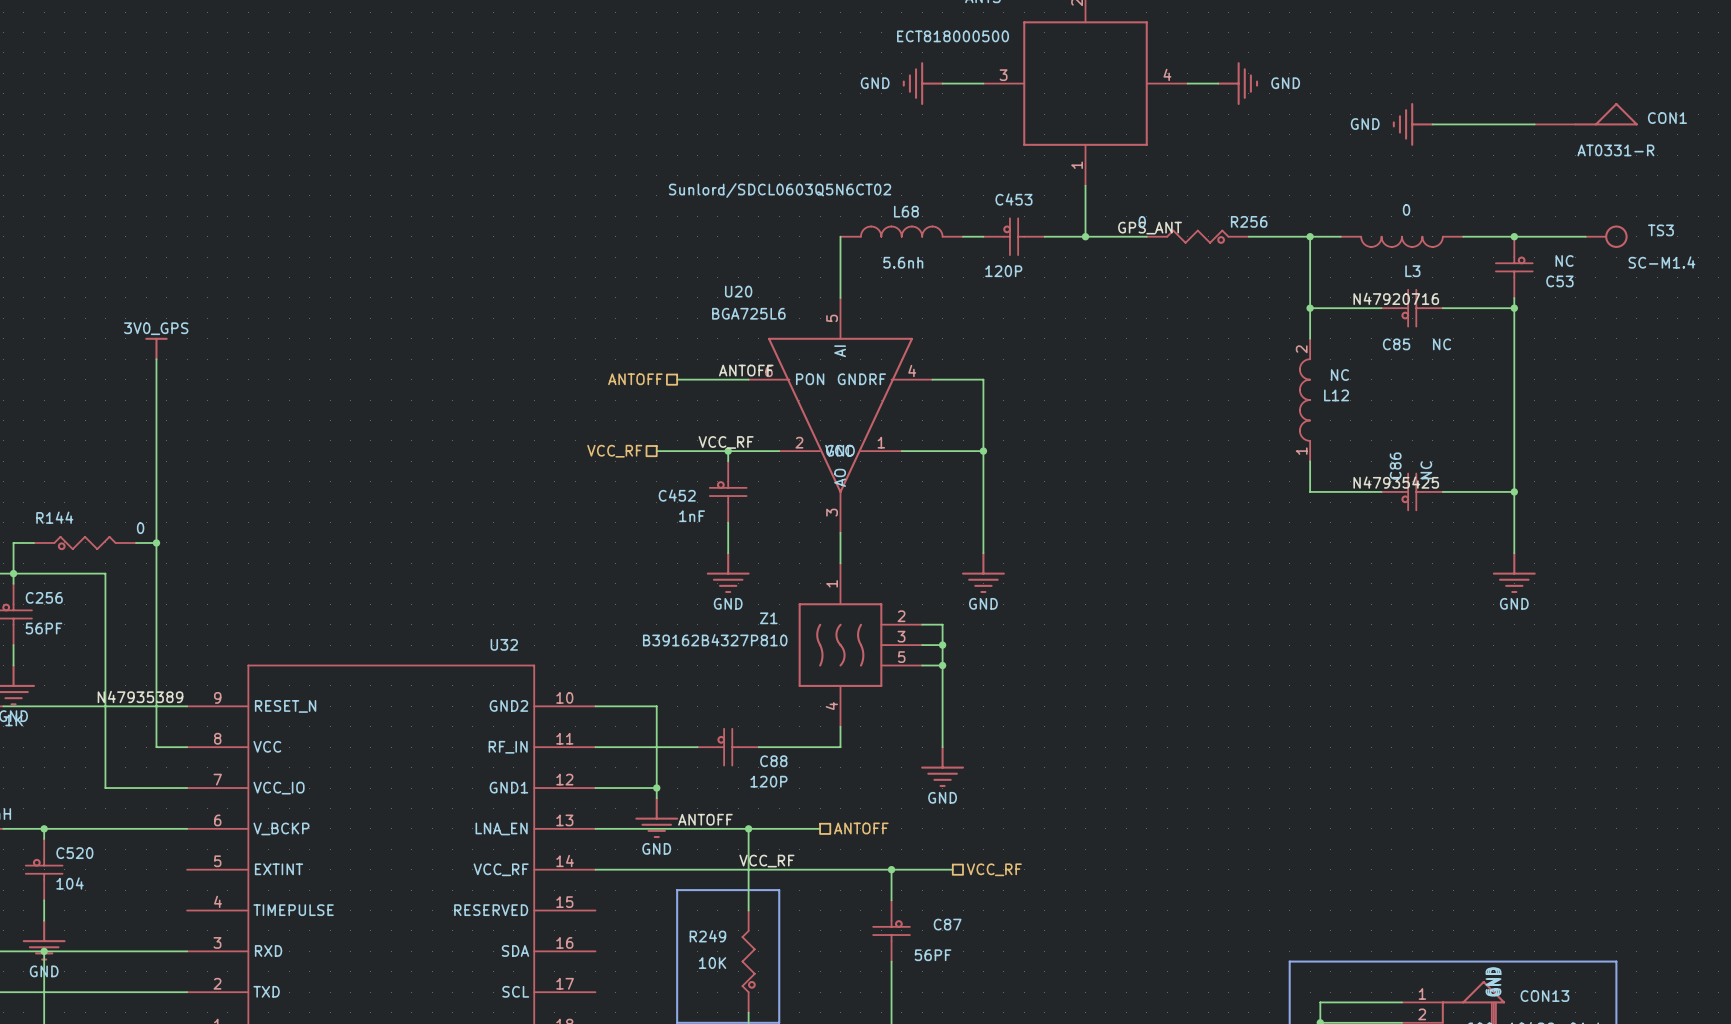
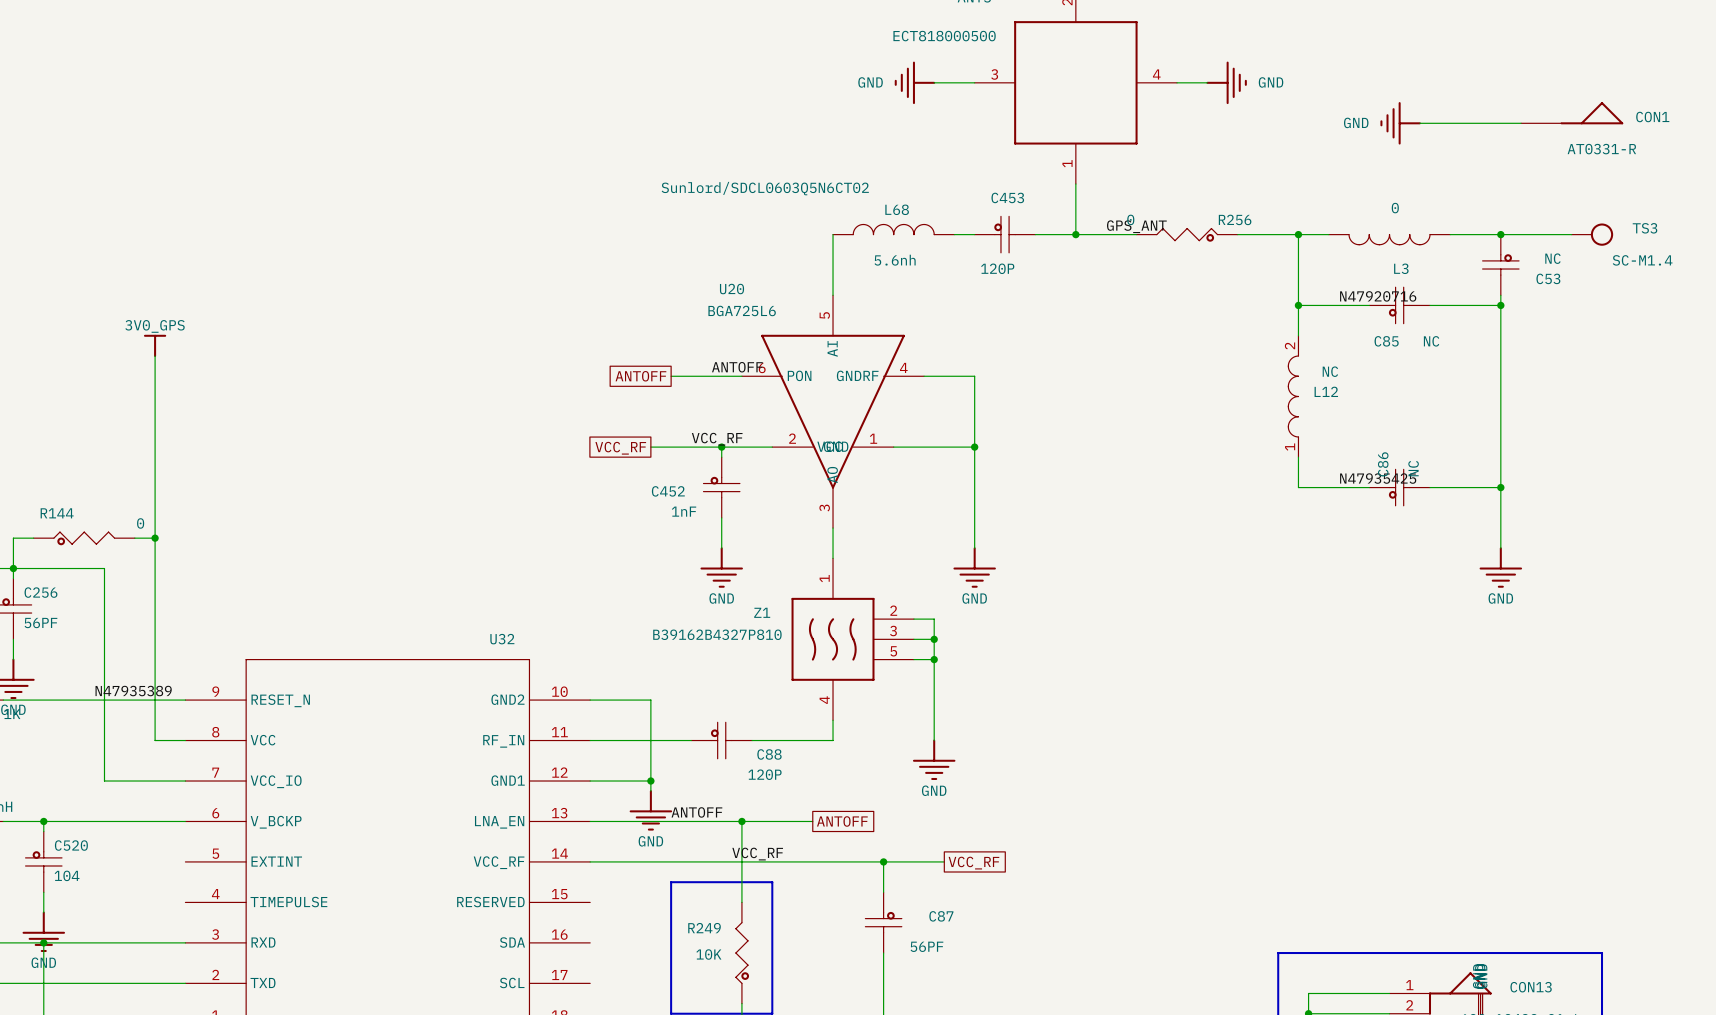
hierarchical label: ANTOFF (635, 379) -> none
global label: none -> ANTOFF (640, 376)
hierarchical label: VCC_RF (614, 451) -> none
global label: none -> VCC_RF (620, 448)
global label: none -> ANTOFF (842, 821)
hierarchical label: ANTOFF (861, 828) -> none
hierarchical label: VCC_RF (994, 869) -> none
global label: none -> VCC_RF (973, 863)

